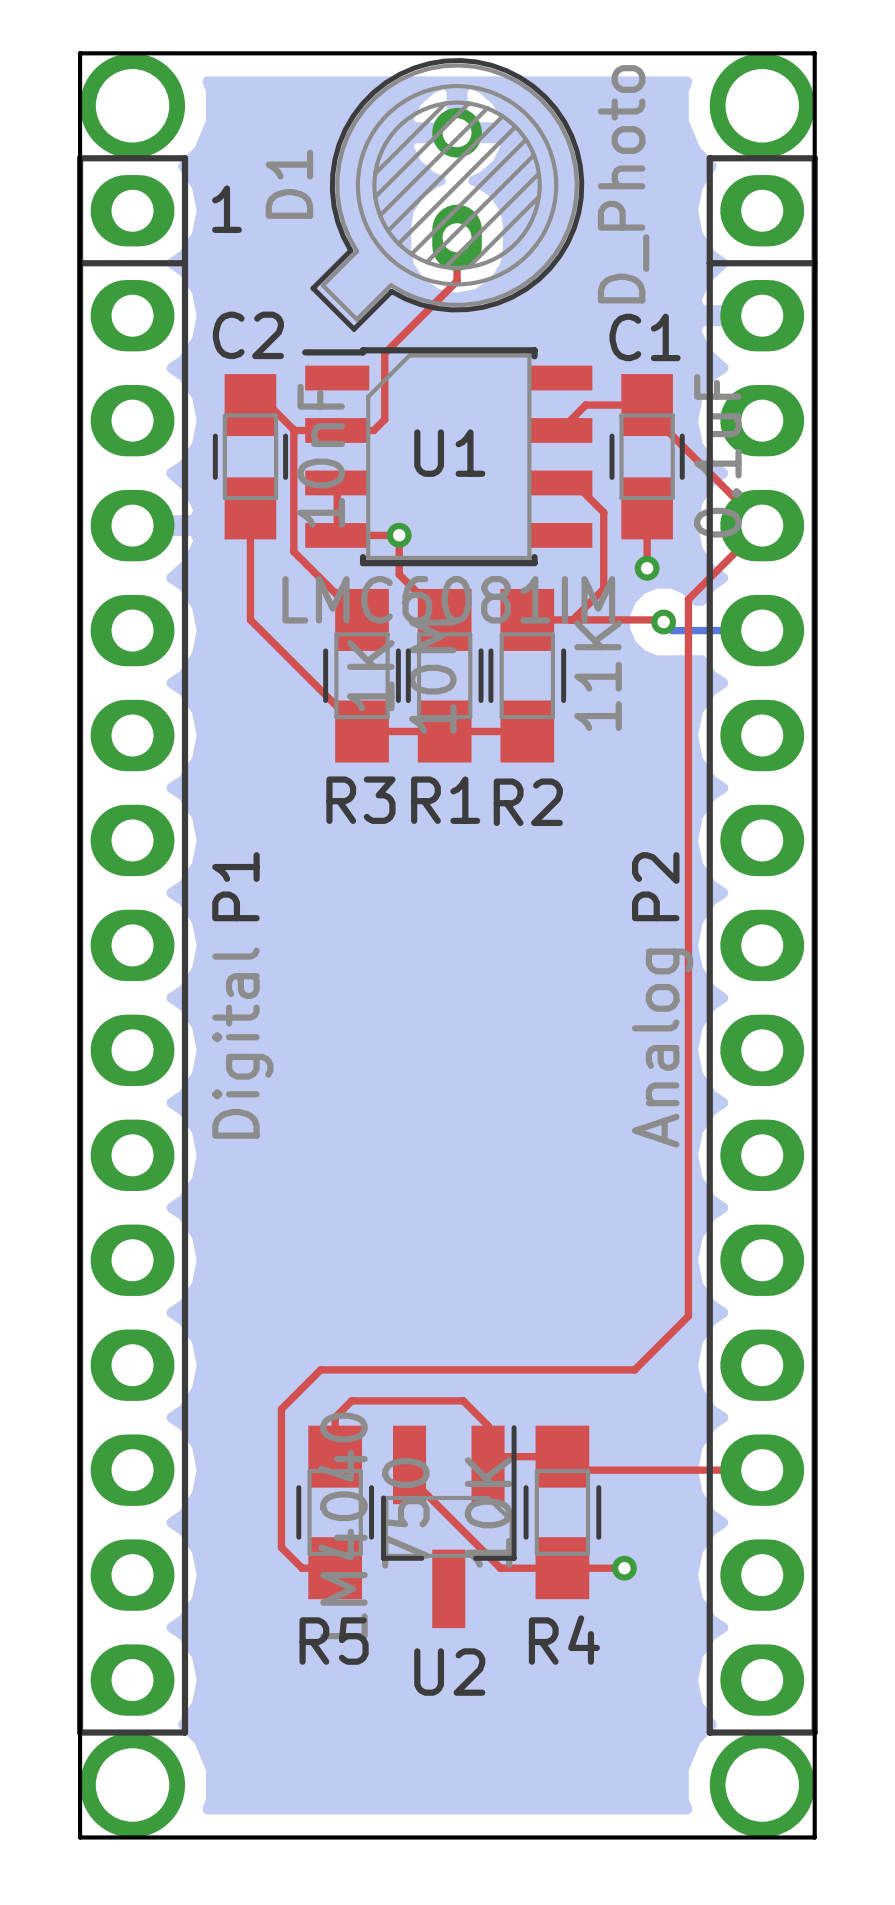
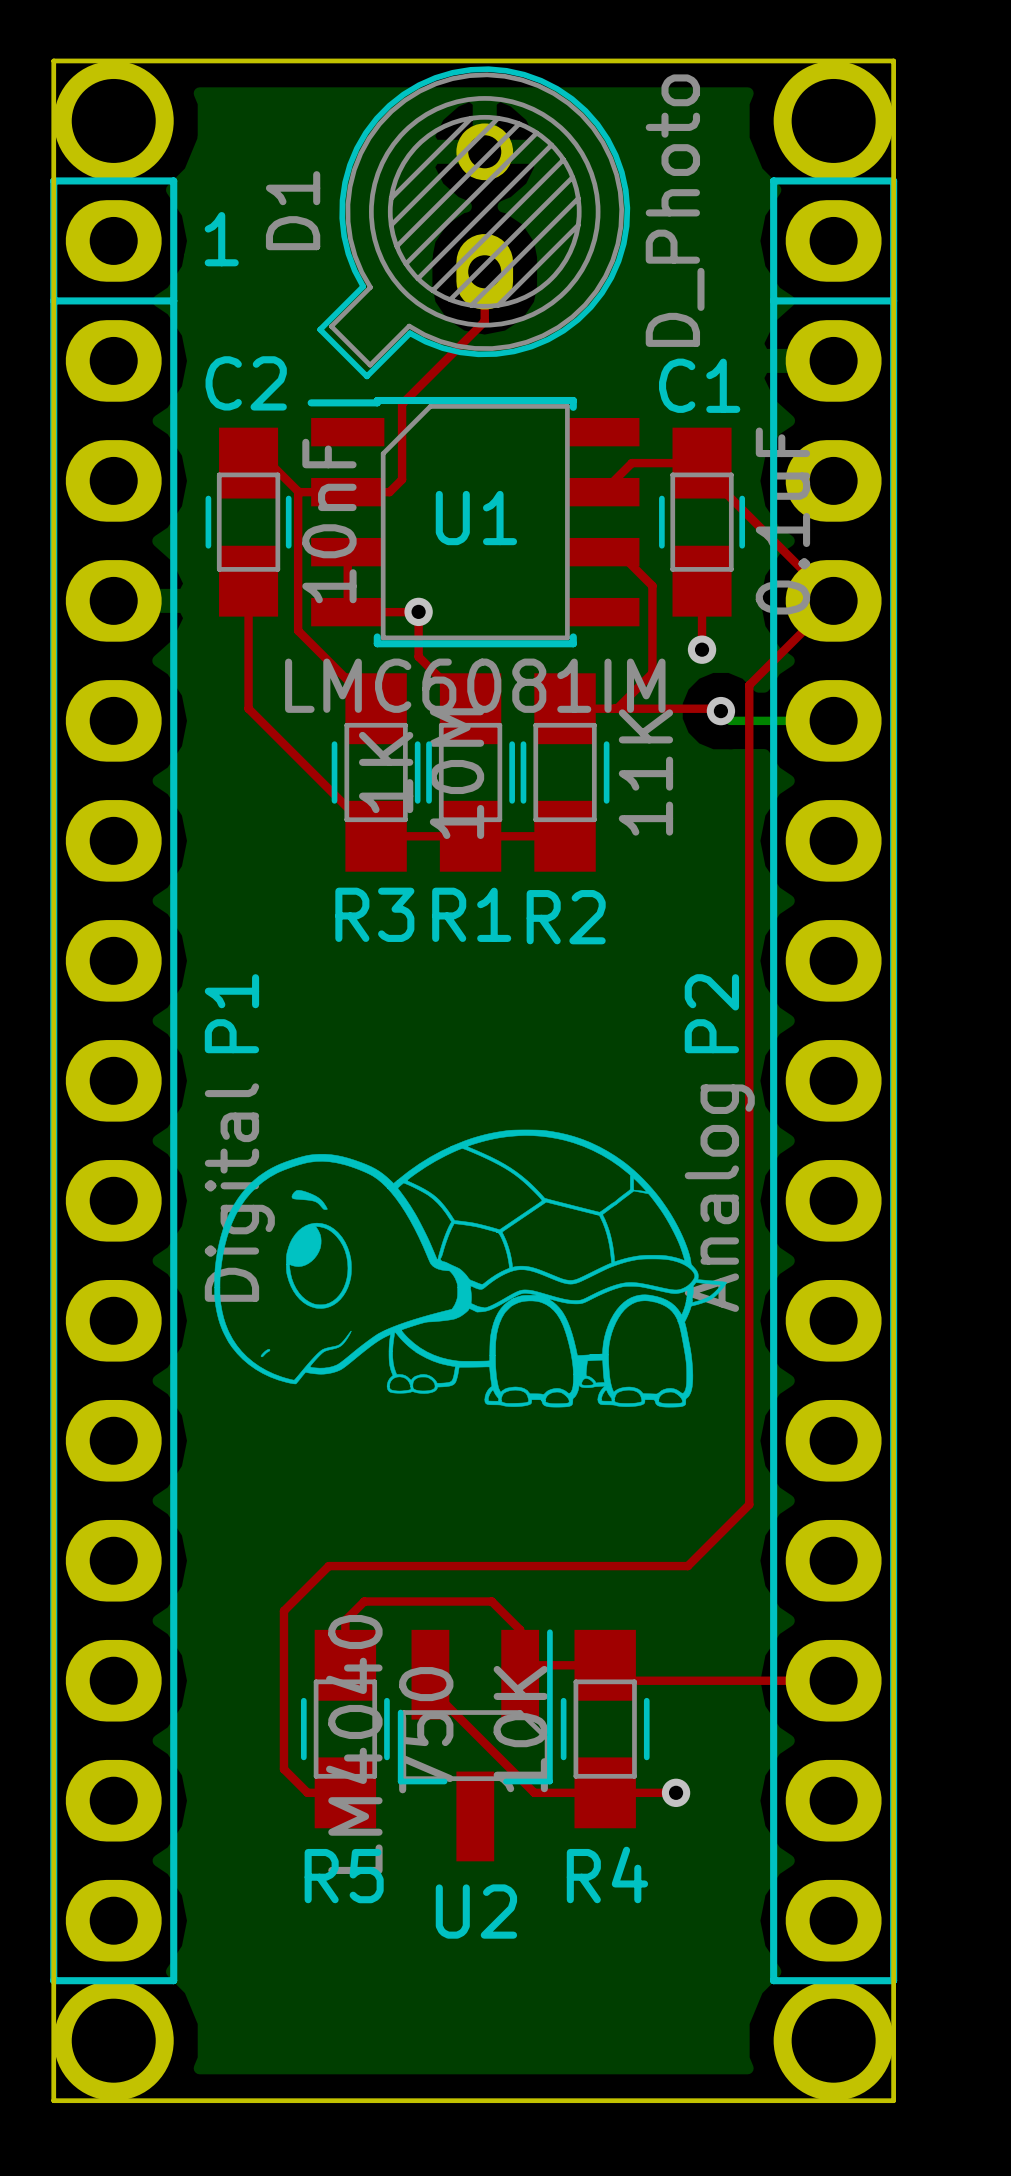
drawing: none -> [214, 1129, 727, 1408]

